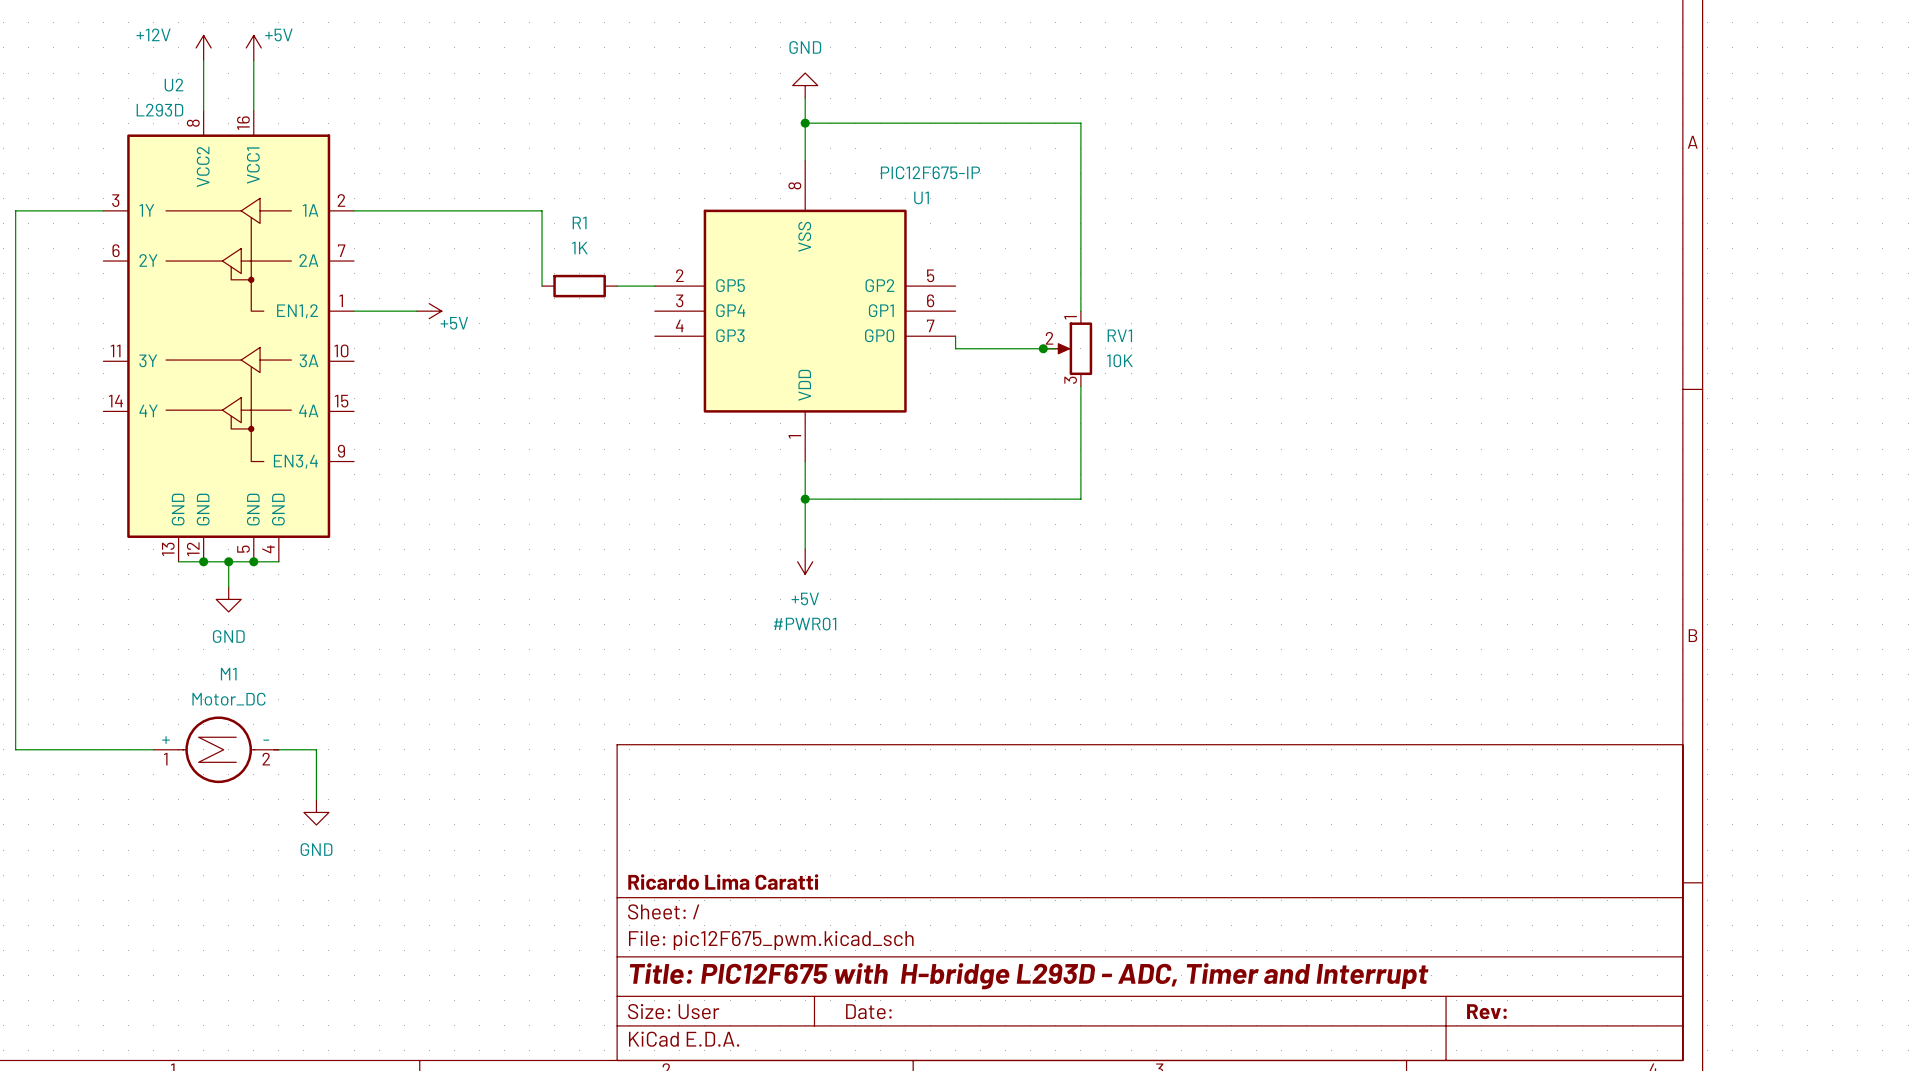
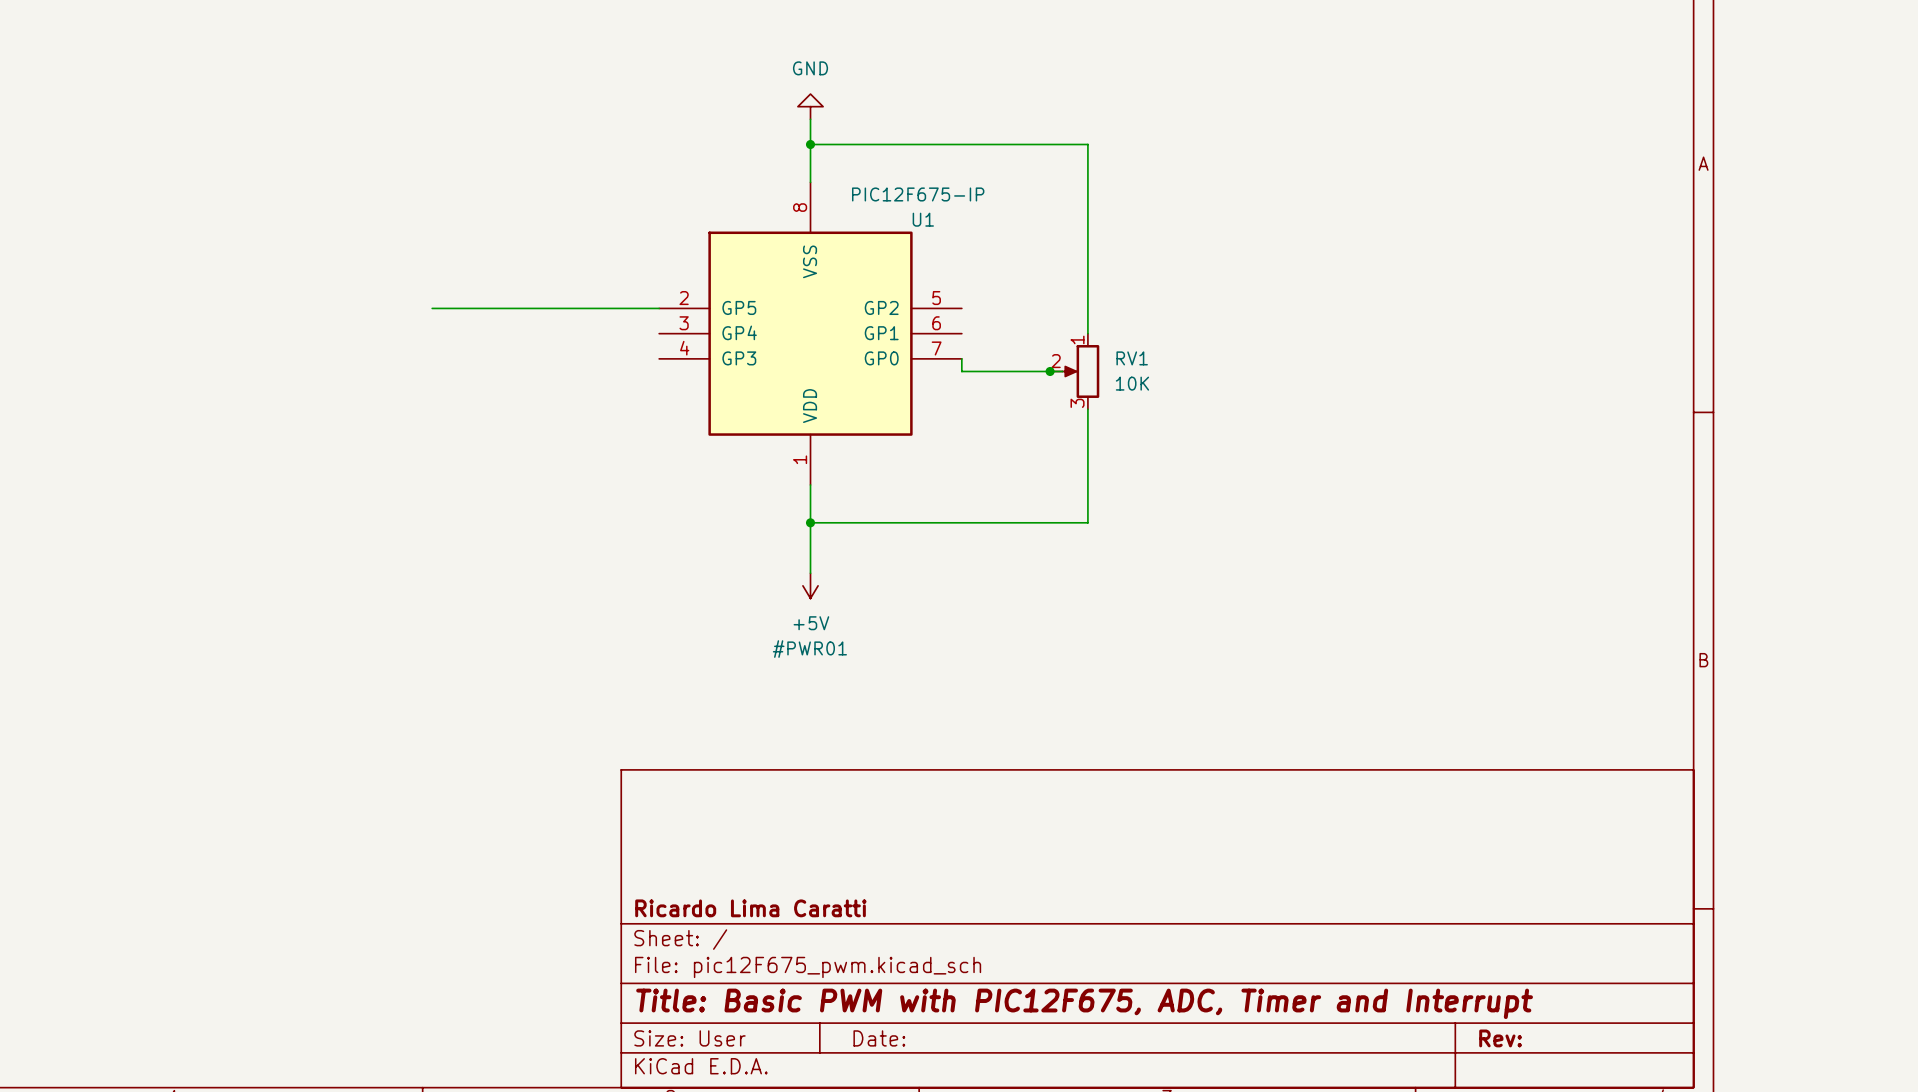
power symbol: +12V (203, 47) -> none
power symbol: +5V (253, 47) -> none
wire: (203, 60) (203, 110) -> none
wire: (253, 60) (253, 110) -> none
wire: (103, 210) (15, 210) (15, 749) (153, 749) -> none
wire: (354, 210) (542, 210) (542, 286) -> none
wire: none -> (432, 308) (621, 308)
R1: 1K (579, 286) -> none
wire: (354, 311) (416, 311) -> none
power symbol: +5V (429, 311) -> none
U2: L293D (228, 336) -> none
wire: (178, 561) (278, 561) -> none
junction: (203, 561) -> none
wire: (228, 561) (228, 586) -> none
junction: (228, 561) -> none
junction: (253, 561) -> none
power symbol: GND (228, 599) -> none
M1: Motor_DC (216, 749) -> none
wire: (278, 749) (316, 749) (316, 799) -> none
power symbol: GND (316, 812) -> none
title block: Title: PIC12F675 with H-bridge L293D - ADC, Timer and Interrupt (1029, 976) -> Title: Basic PWM with PIC12F675, ADC, Timer and Interrupt (1084, 1003)

